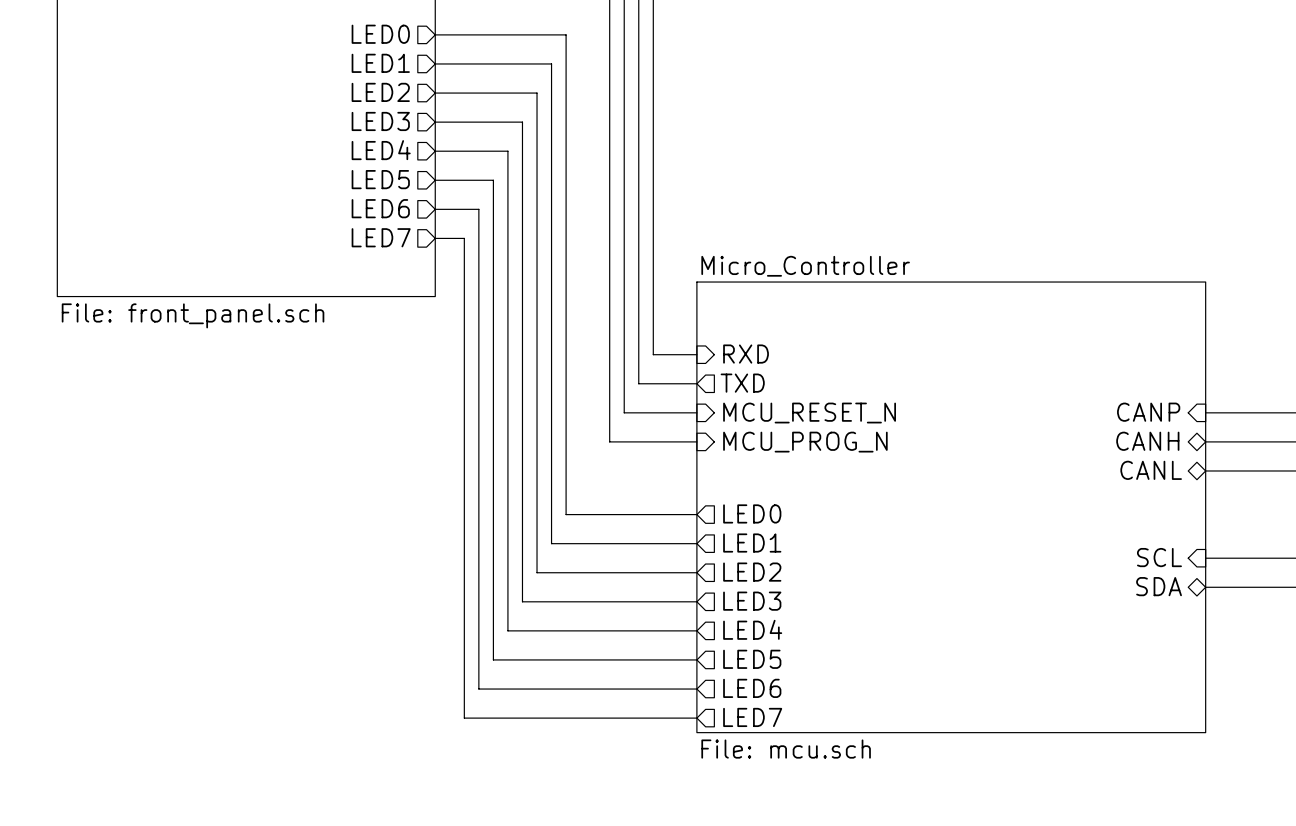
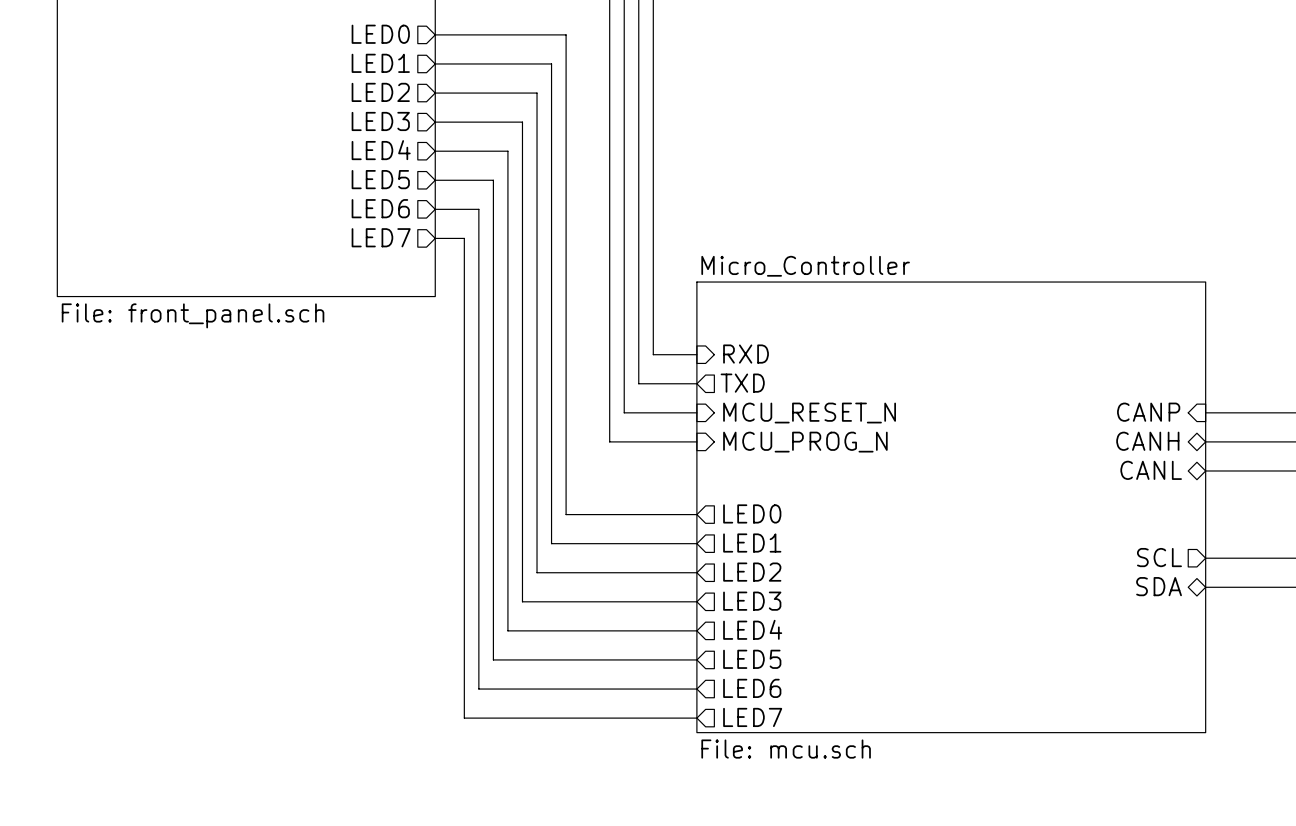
hierarchical label: SCL (1159, 557) -> none
sheet pin: none -> SCL (1159, 557)

